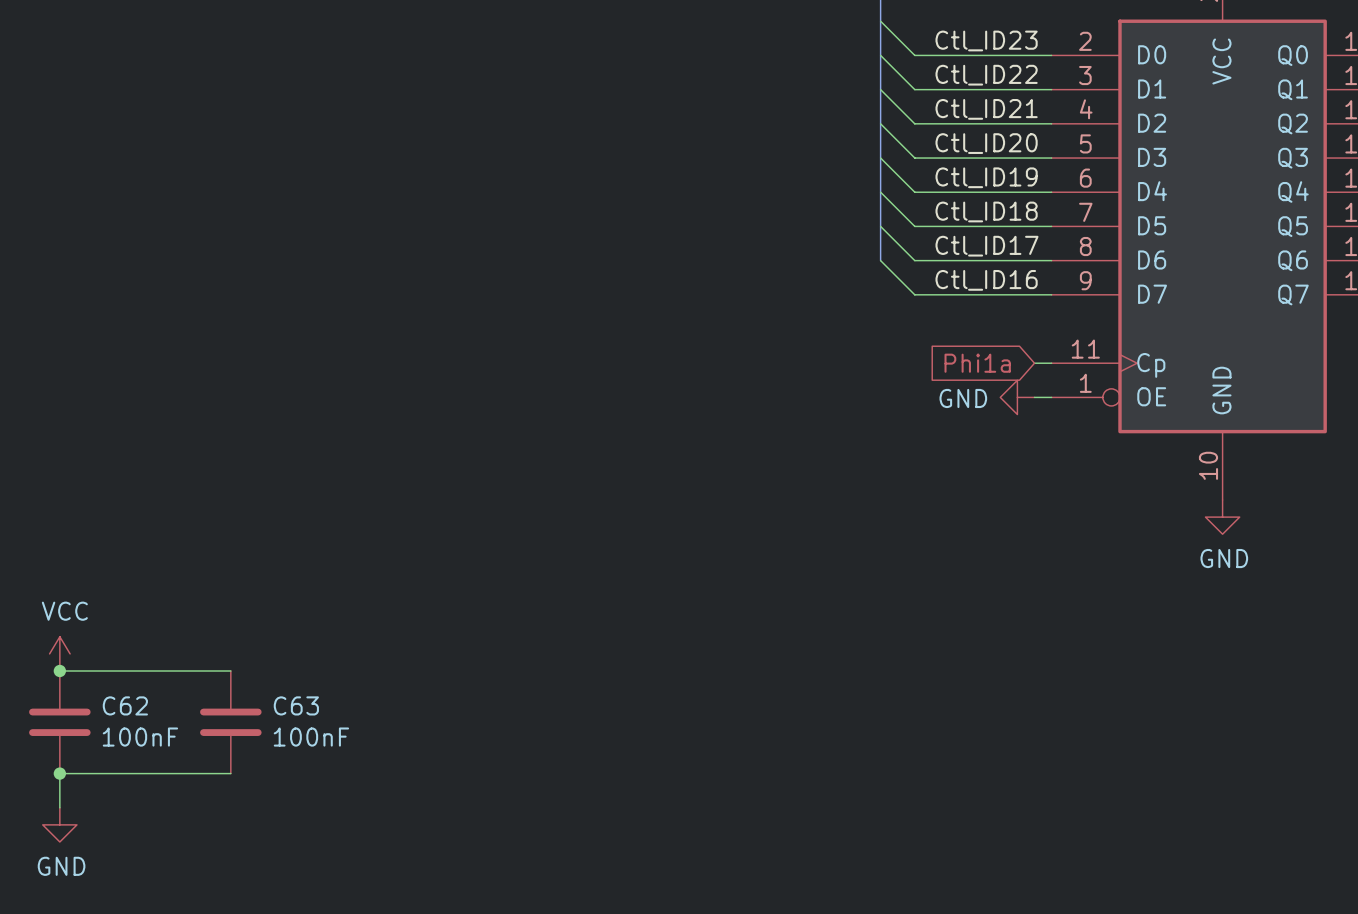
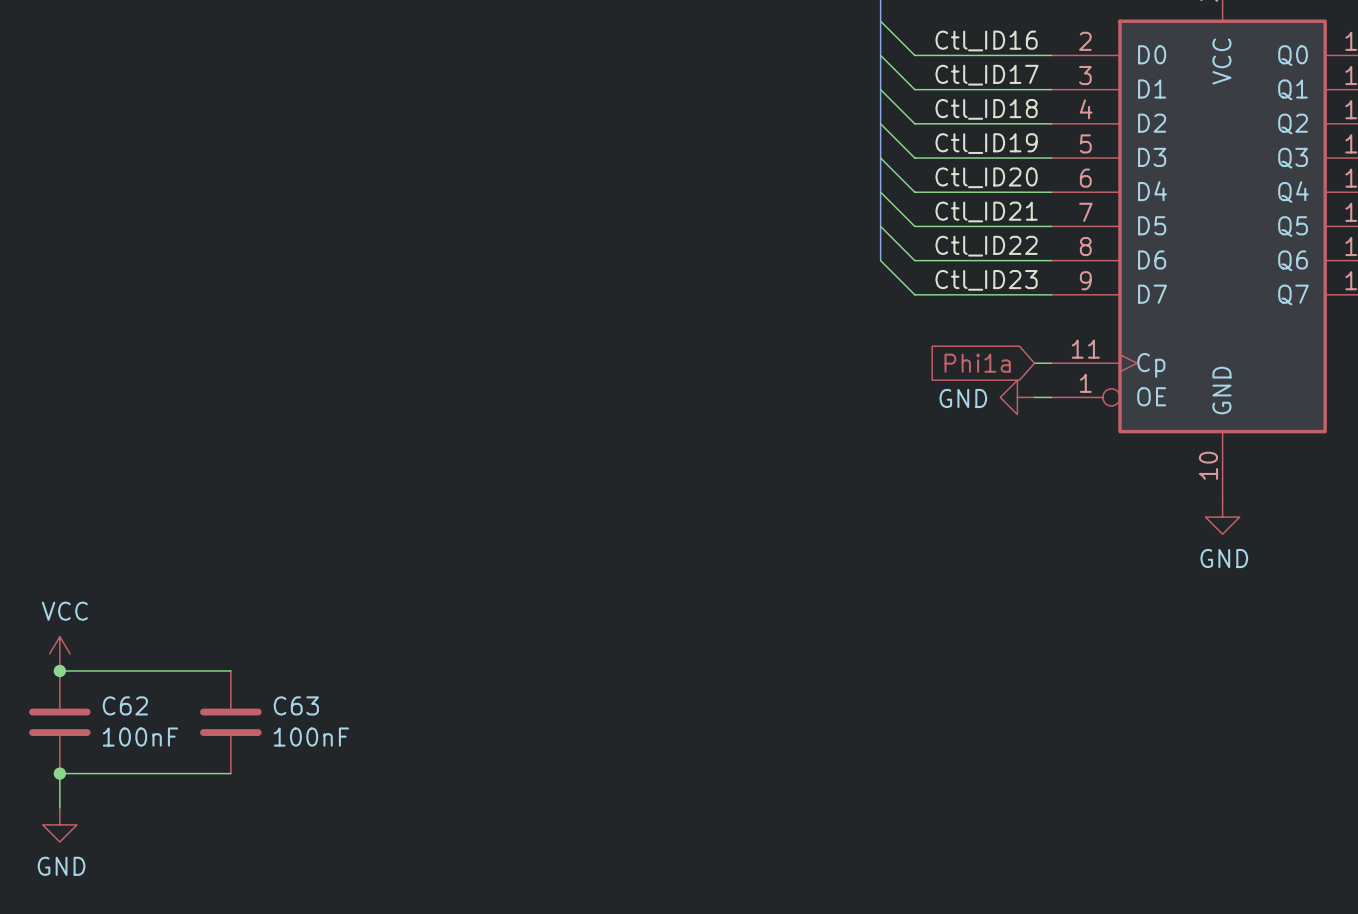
label: Ctl_ID23 (986, 40) -> Ctl_ID16 (986, 40)
label: Ctl_ID22 (986, 75) -> Ctl_ID17 (986, 75)
label: Ctl_ID21 (986, 109) -> Ctl_ID18 (986, 109)
label: Ctl_ID20 (986, 143) -> Ctl_ID19 (986, 143)
label: Ctl_ID19 (986, 177) -> Ctl_ID20 (986, 177)
label: Ctl_ID18 (986, 211) -> Ctl_ID21 (986, 211)
label: Ctl_ID17 (986, 246) -> Ctl_ID22 (986, 246)
label: Ctl_ID16 (986, 280) -> Ctl_ID23 (986, 280)

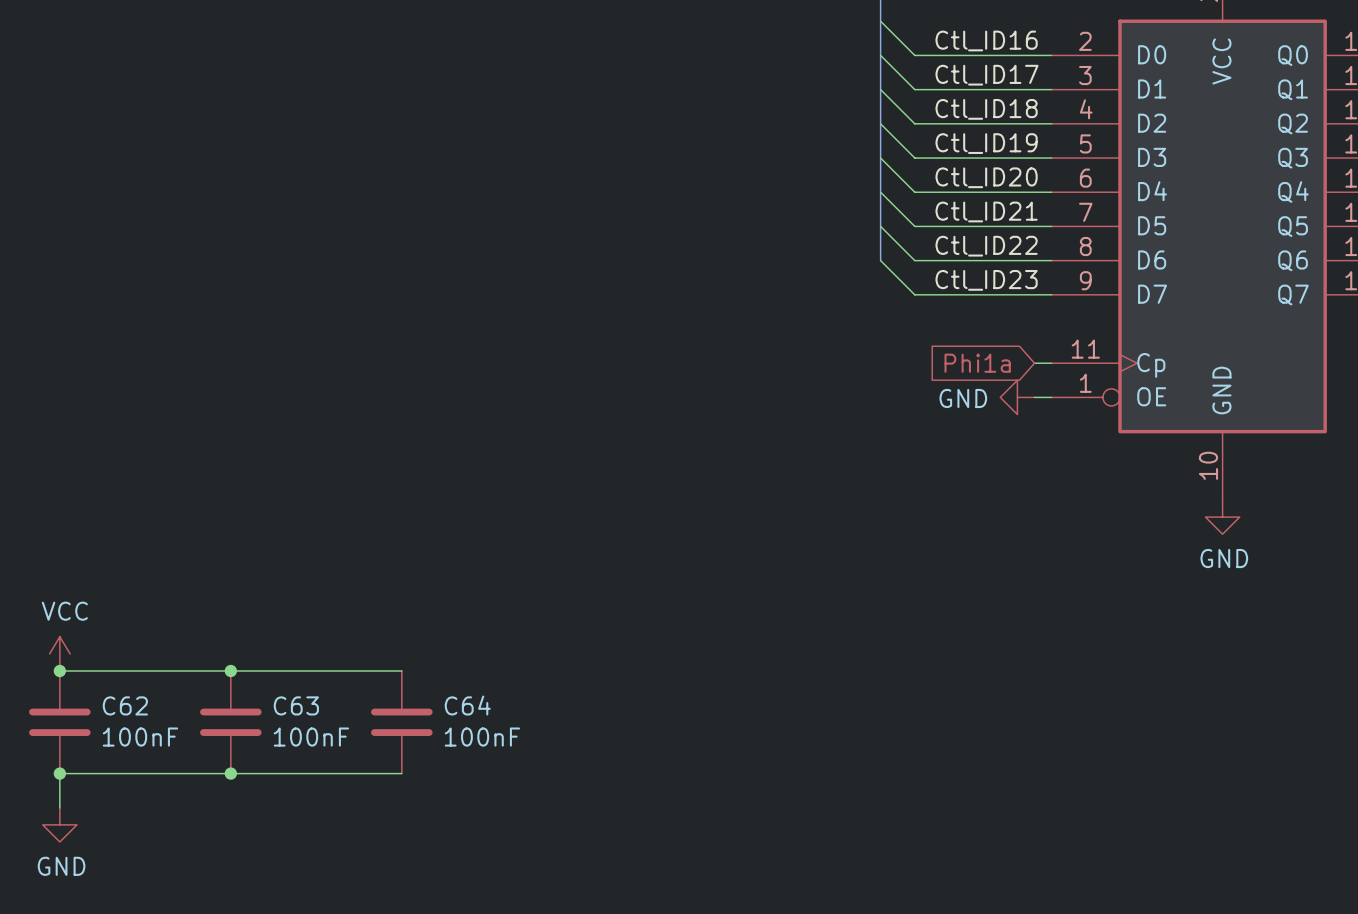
wire: none -> (230, 671) (401, 671)
junction: none -> (230, 671)
C64: none -> 100nF (401, 722)
wire: none -> (230, 773) (401, 773)
junction: none -> (230, 773)

